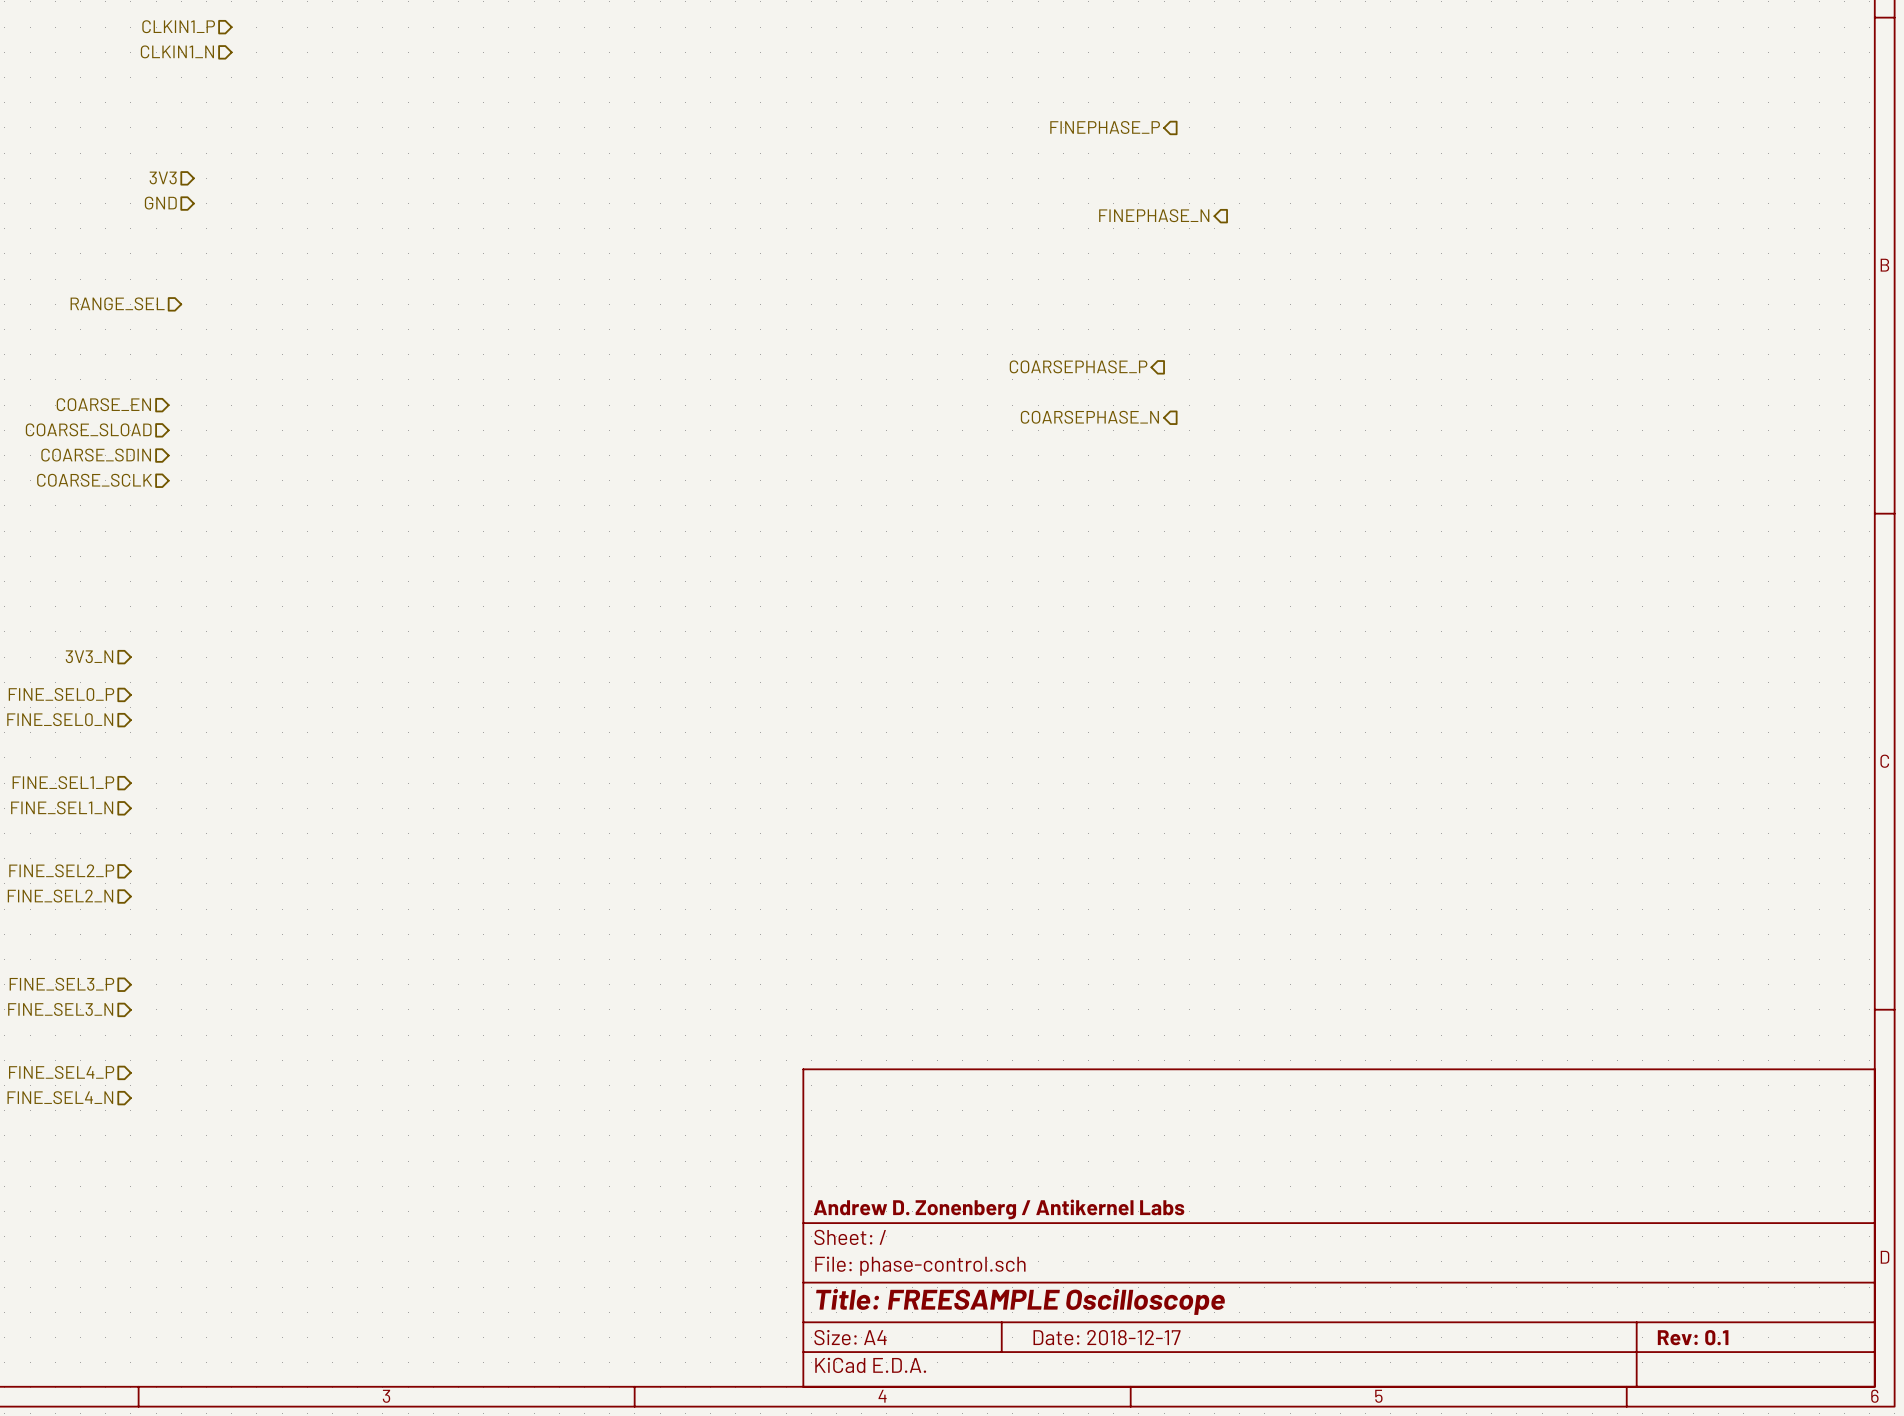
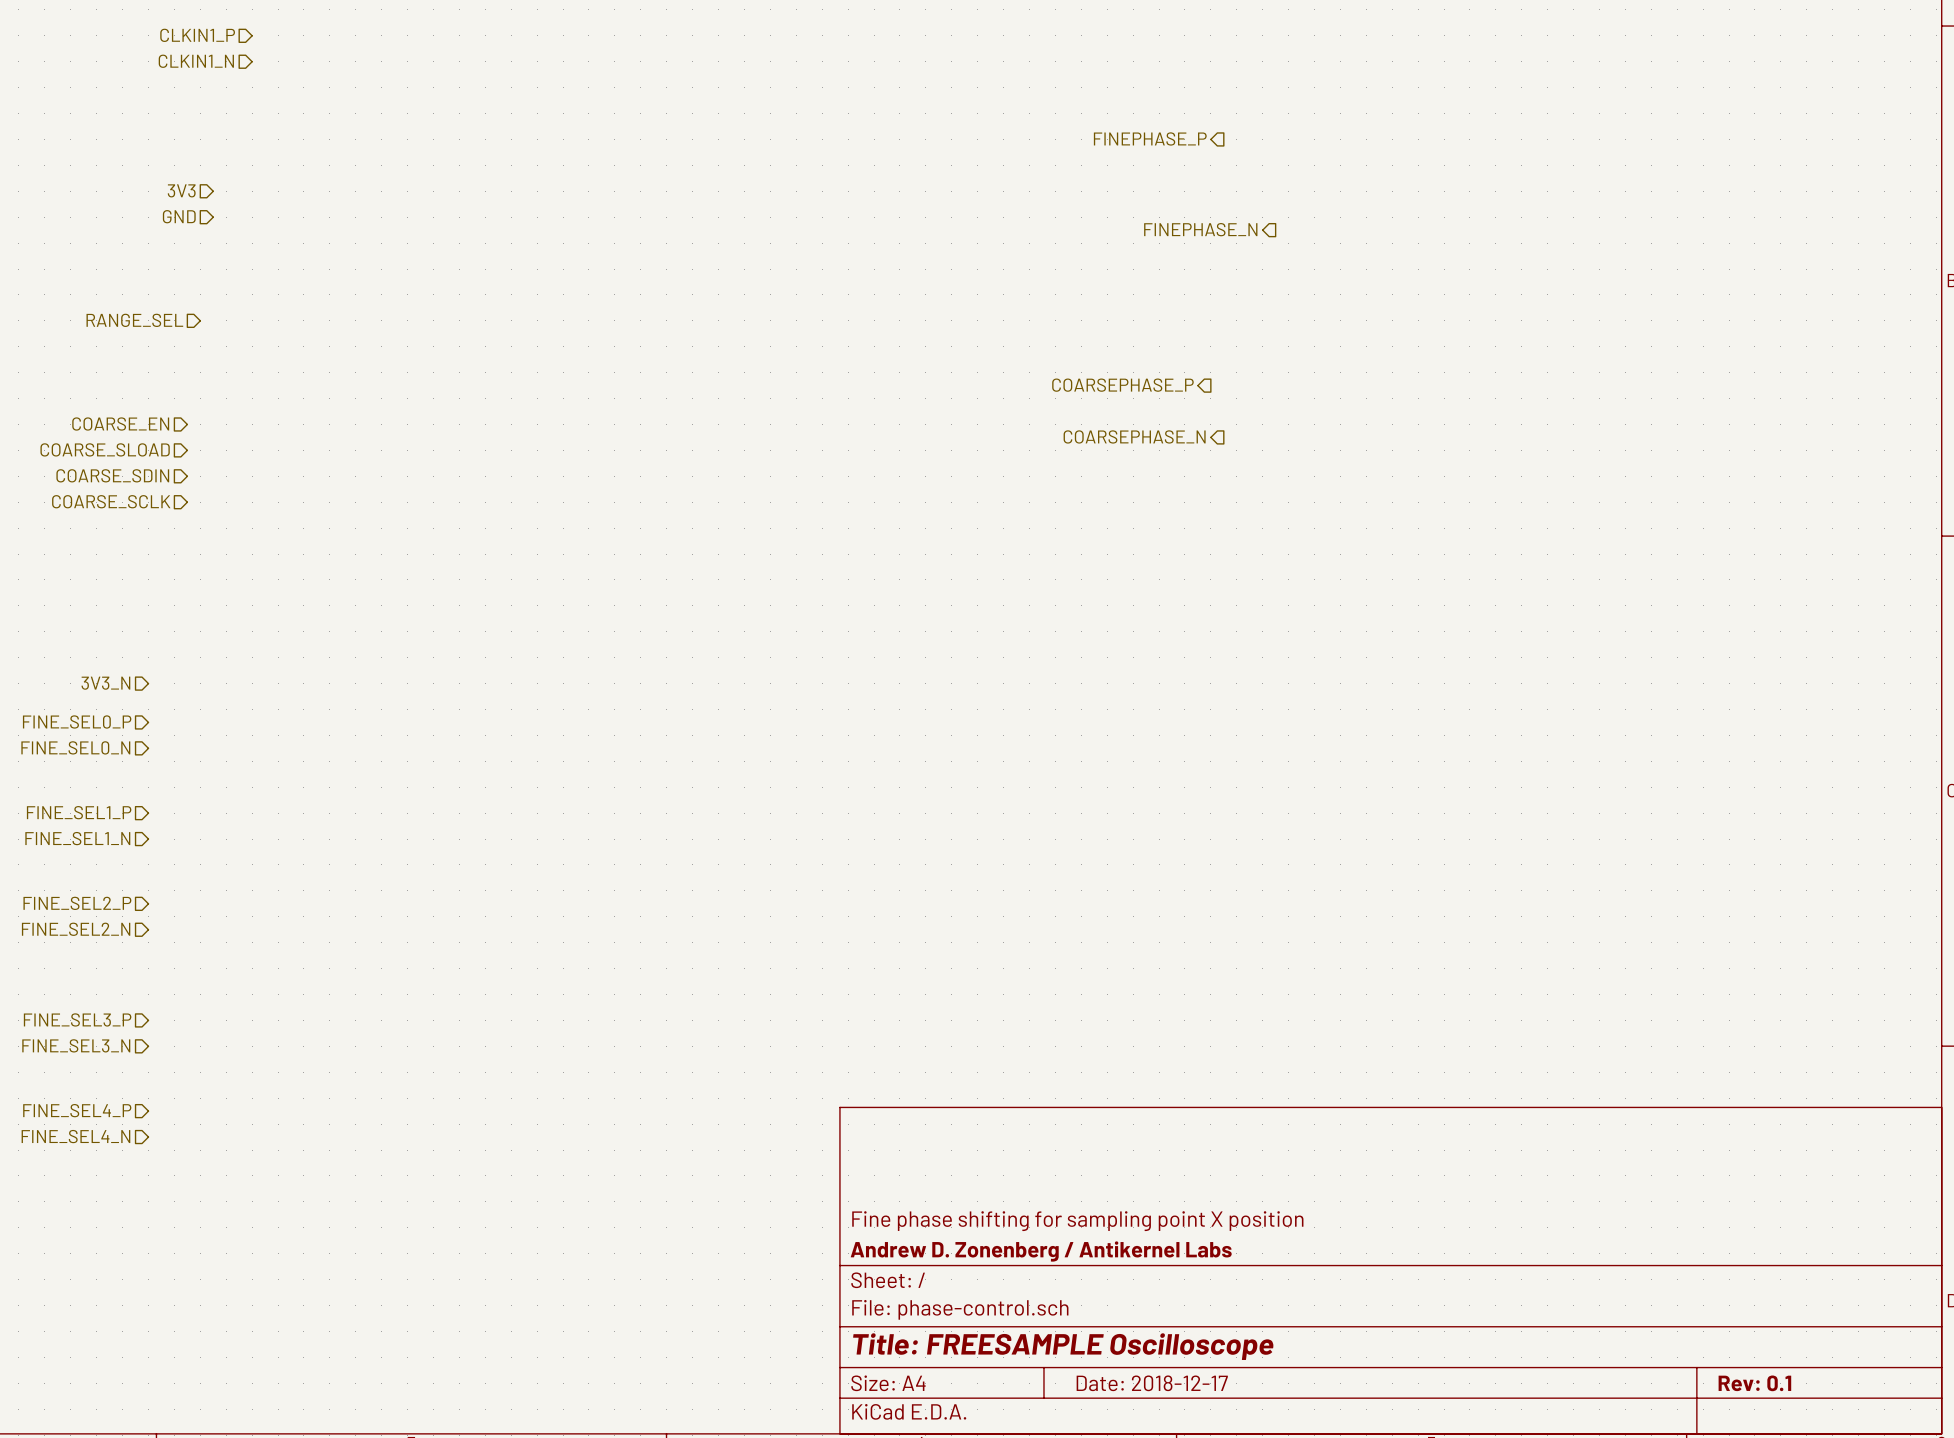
title block: none -> Fine phase shifting for sampling point X position (1077, 1221)

